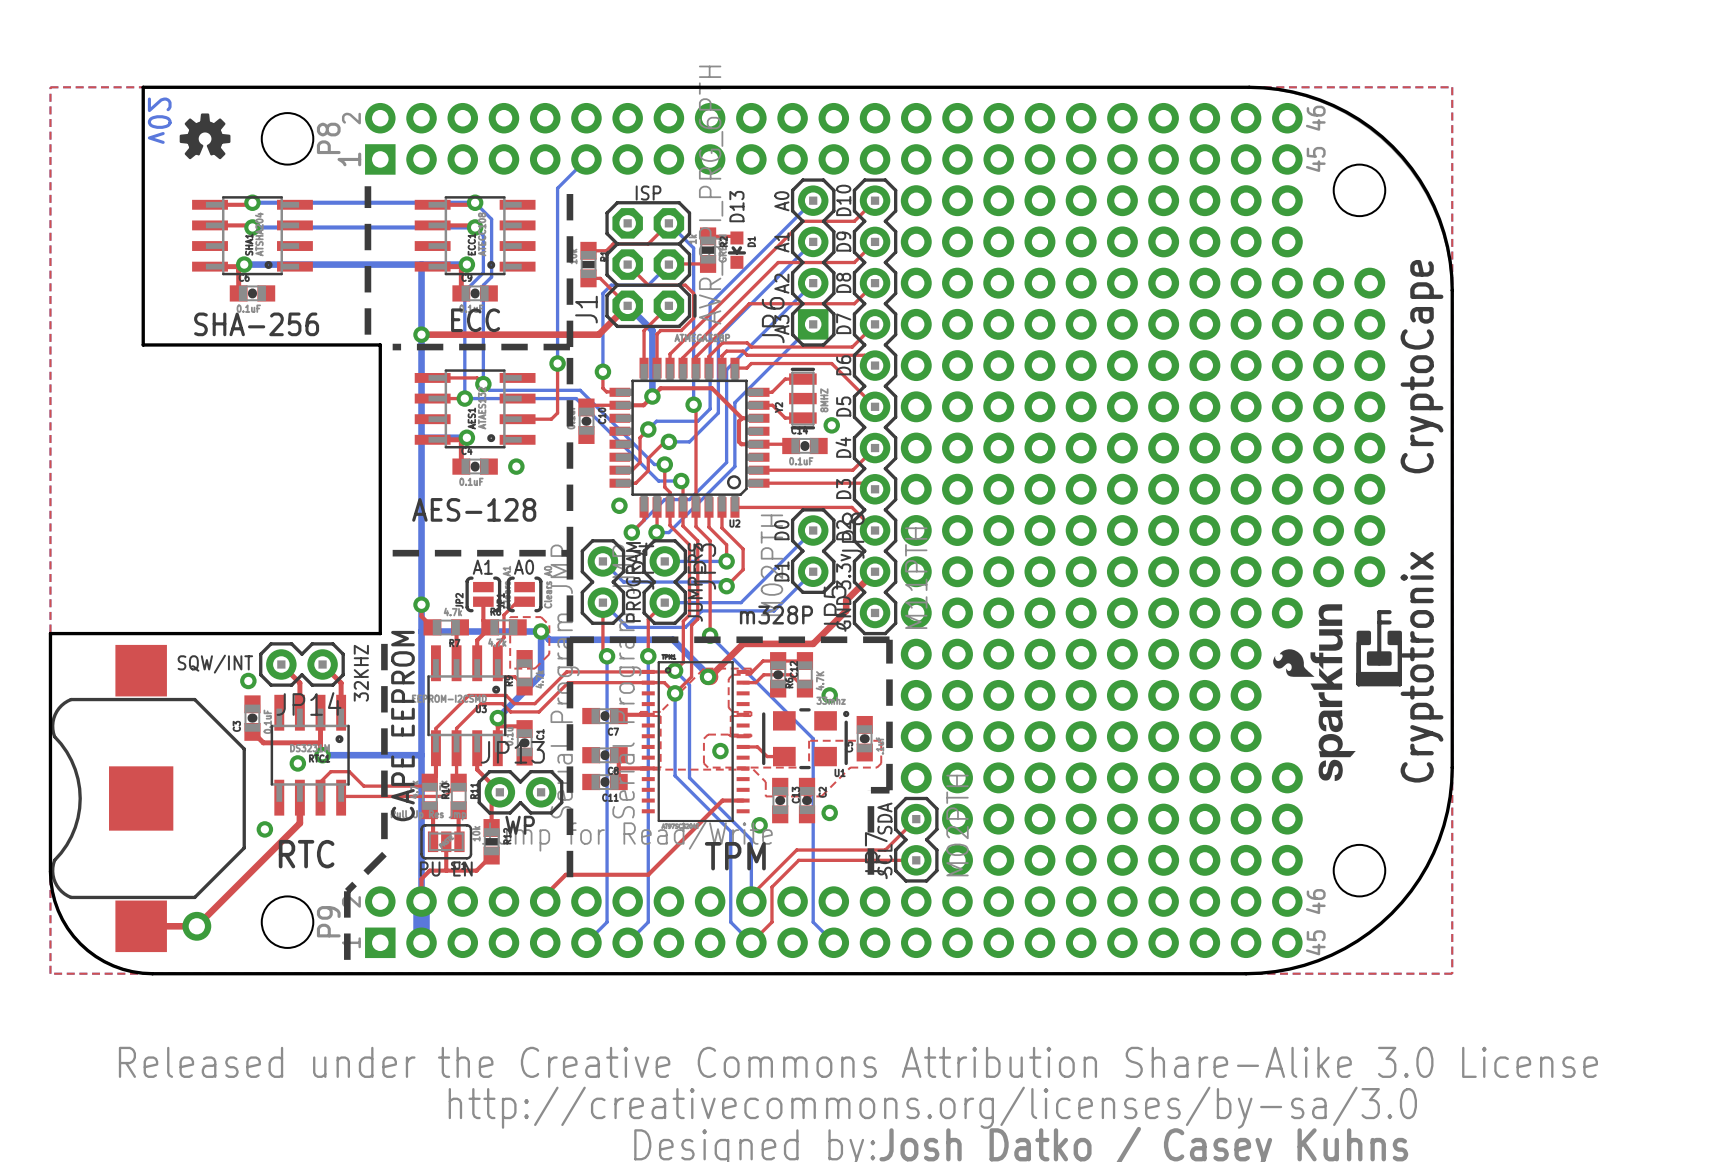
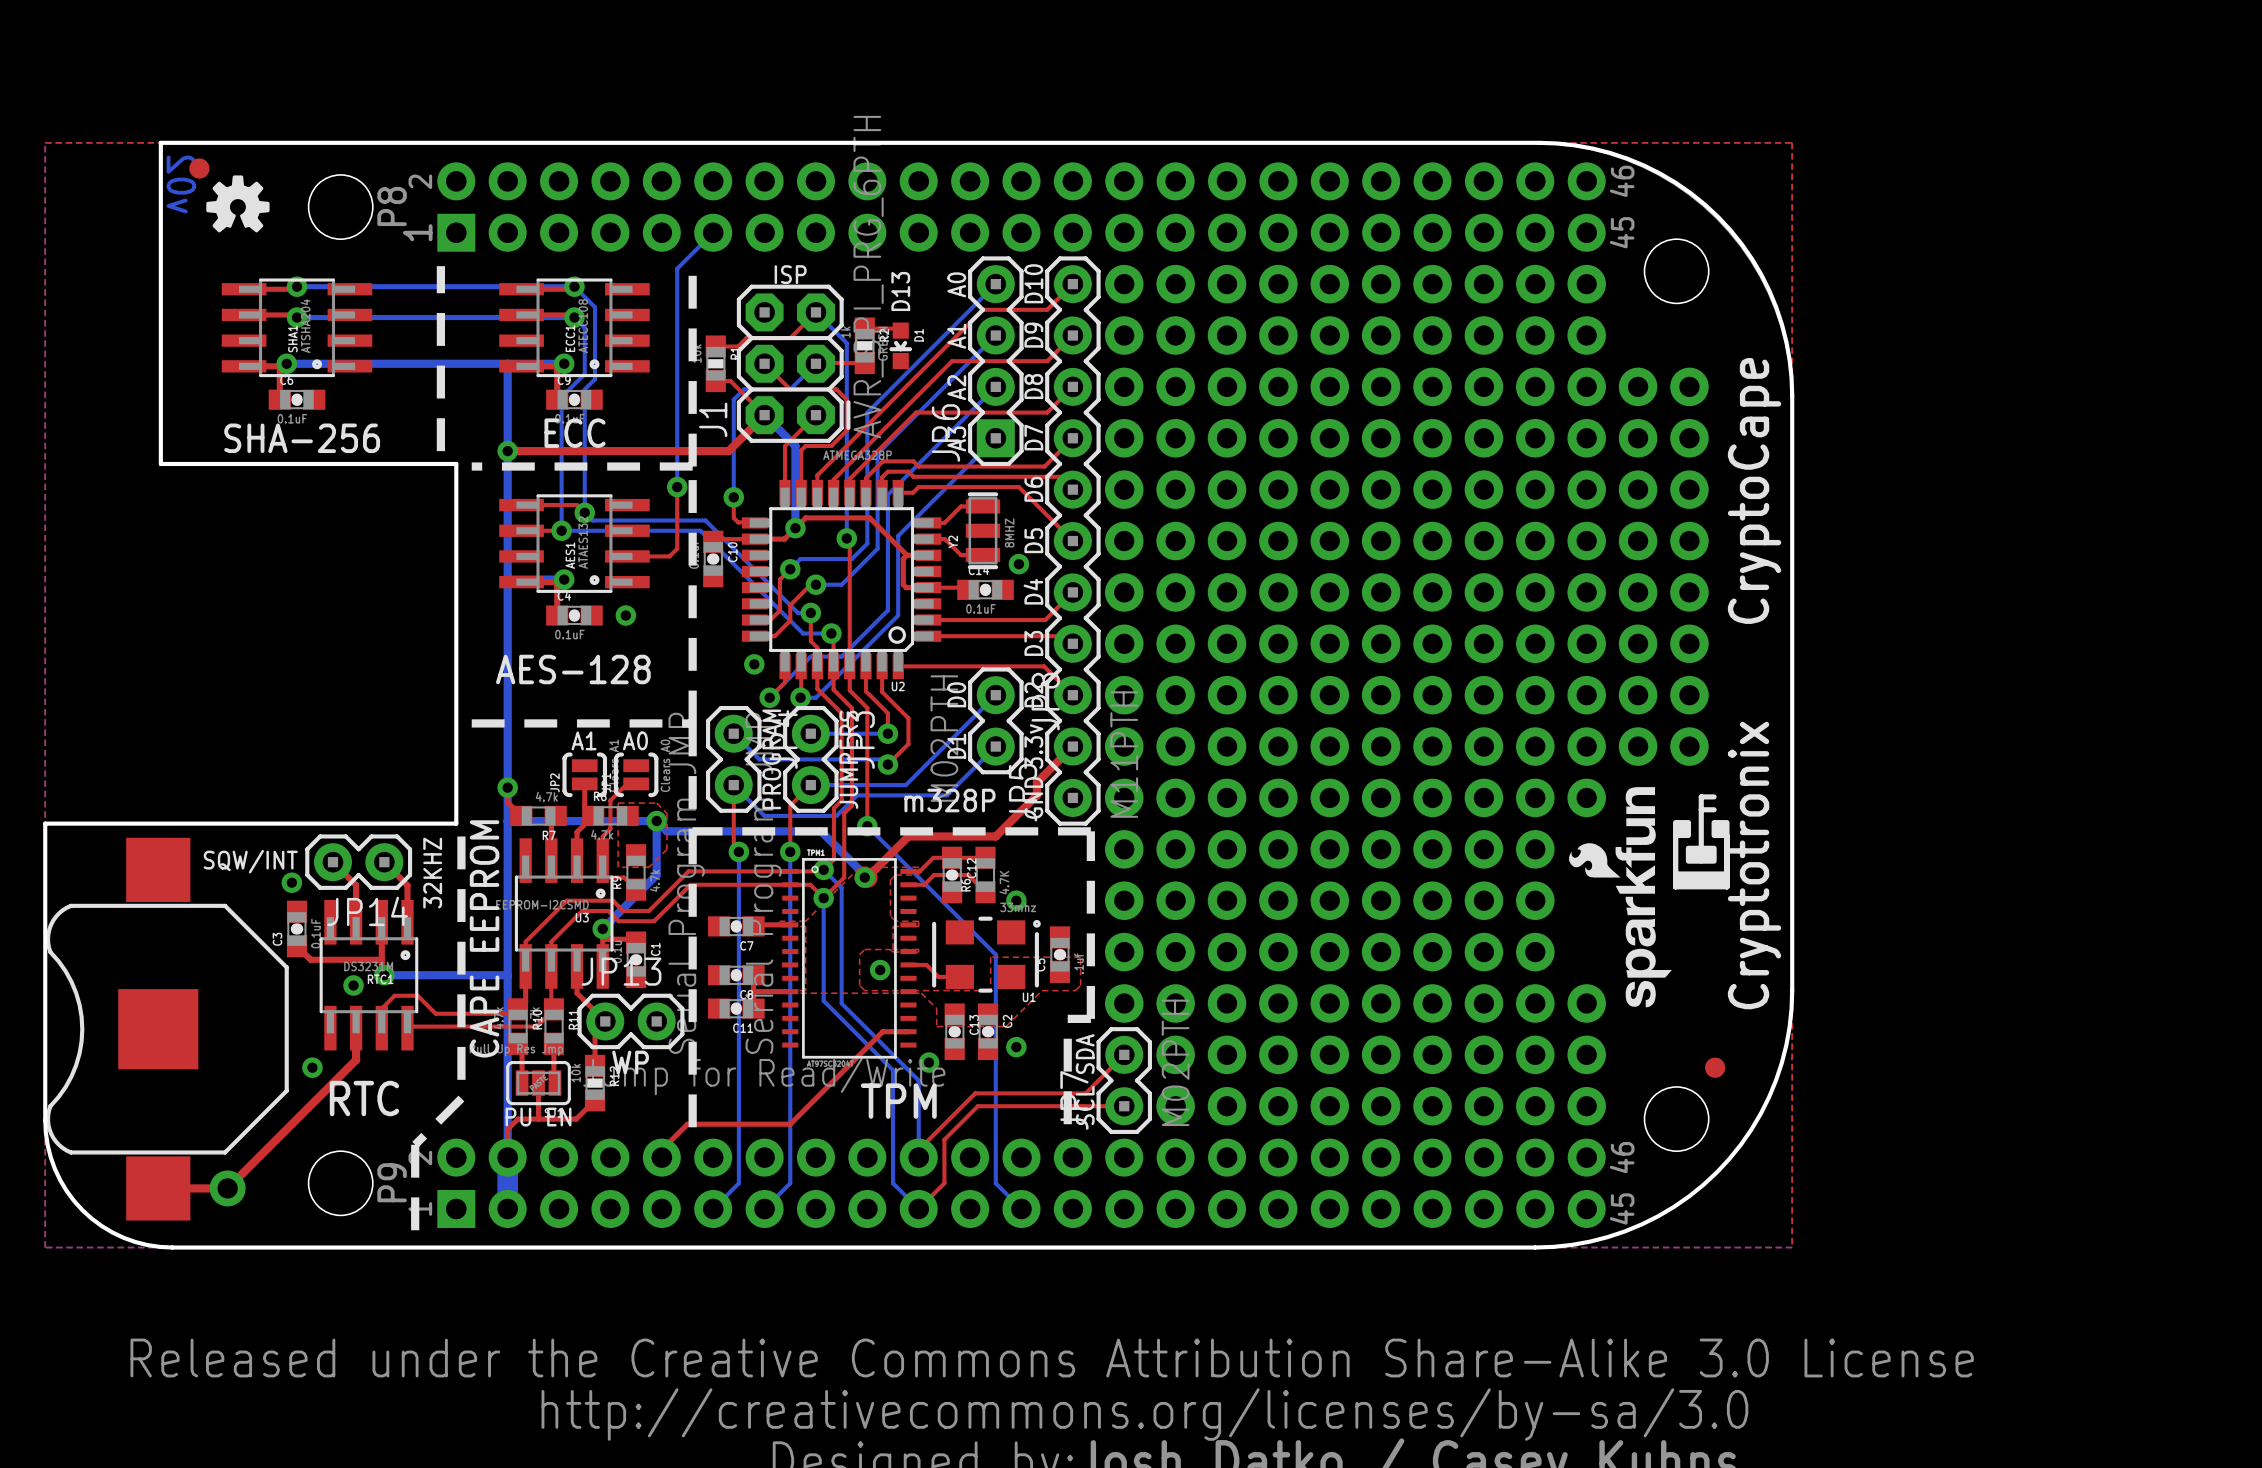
part: none -> (199, 168)
part: none -> (1715, 1067)

